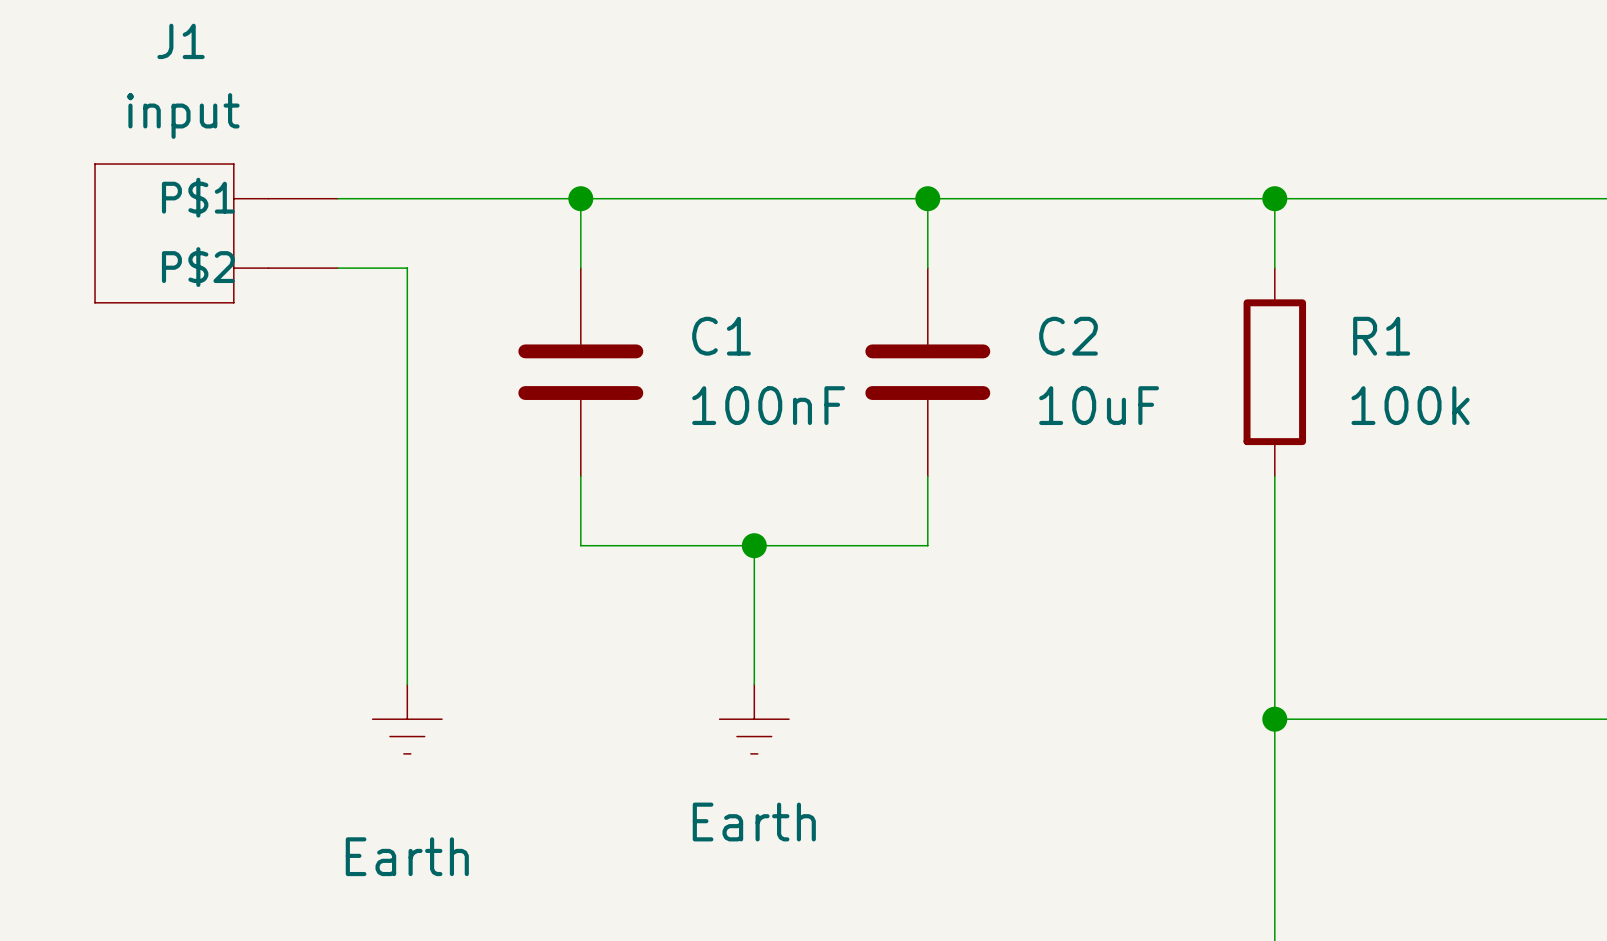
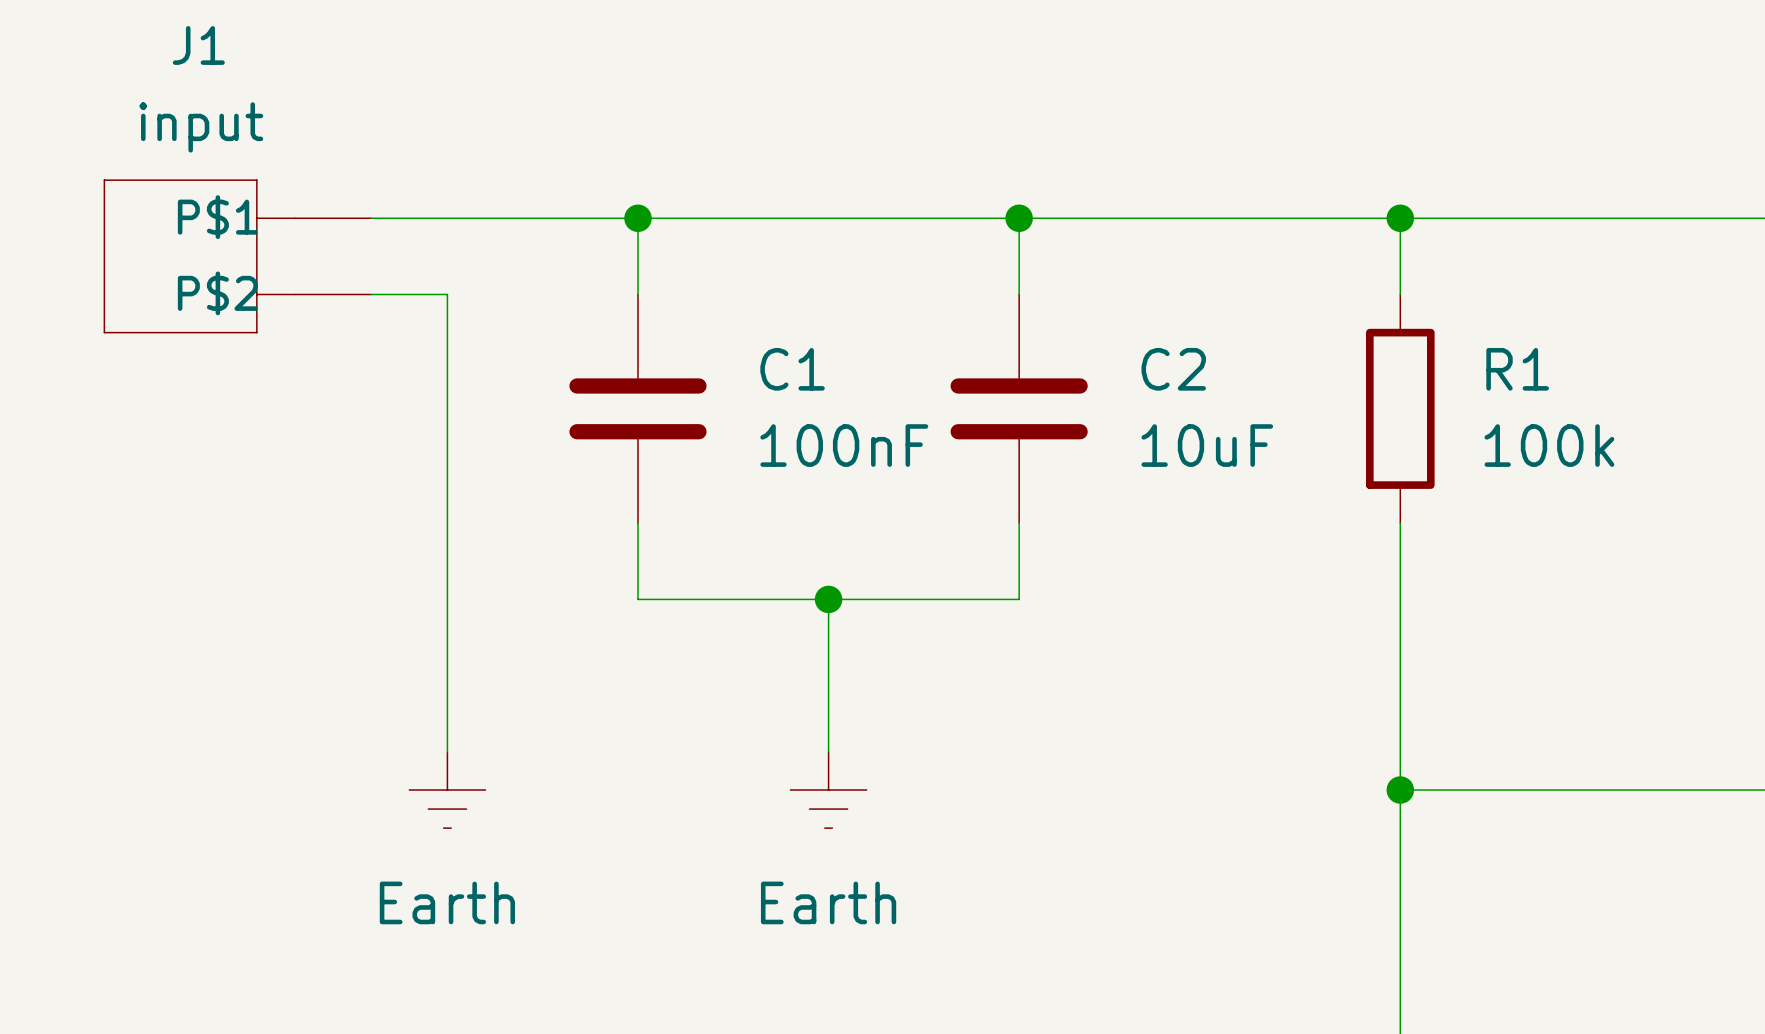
power symbol text position: Earth (407, 856) -> Earth (447, 902)

